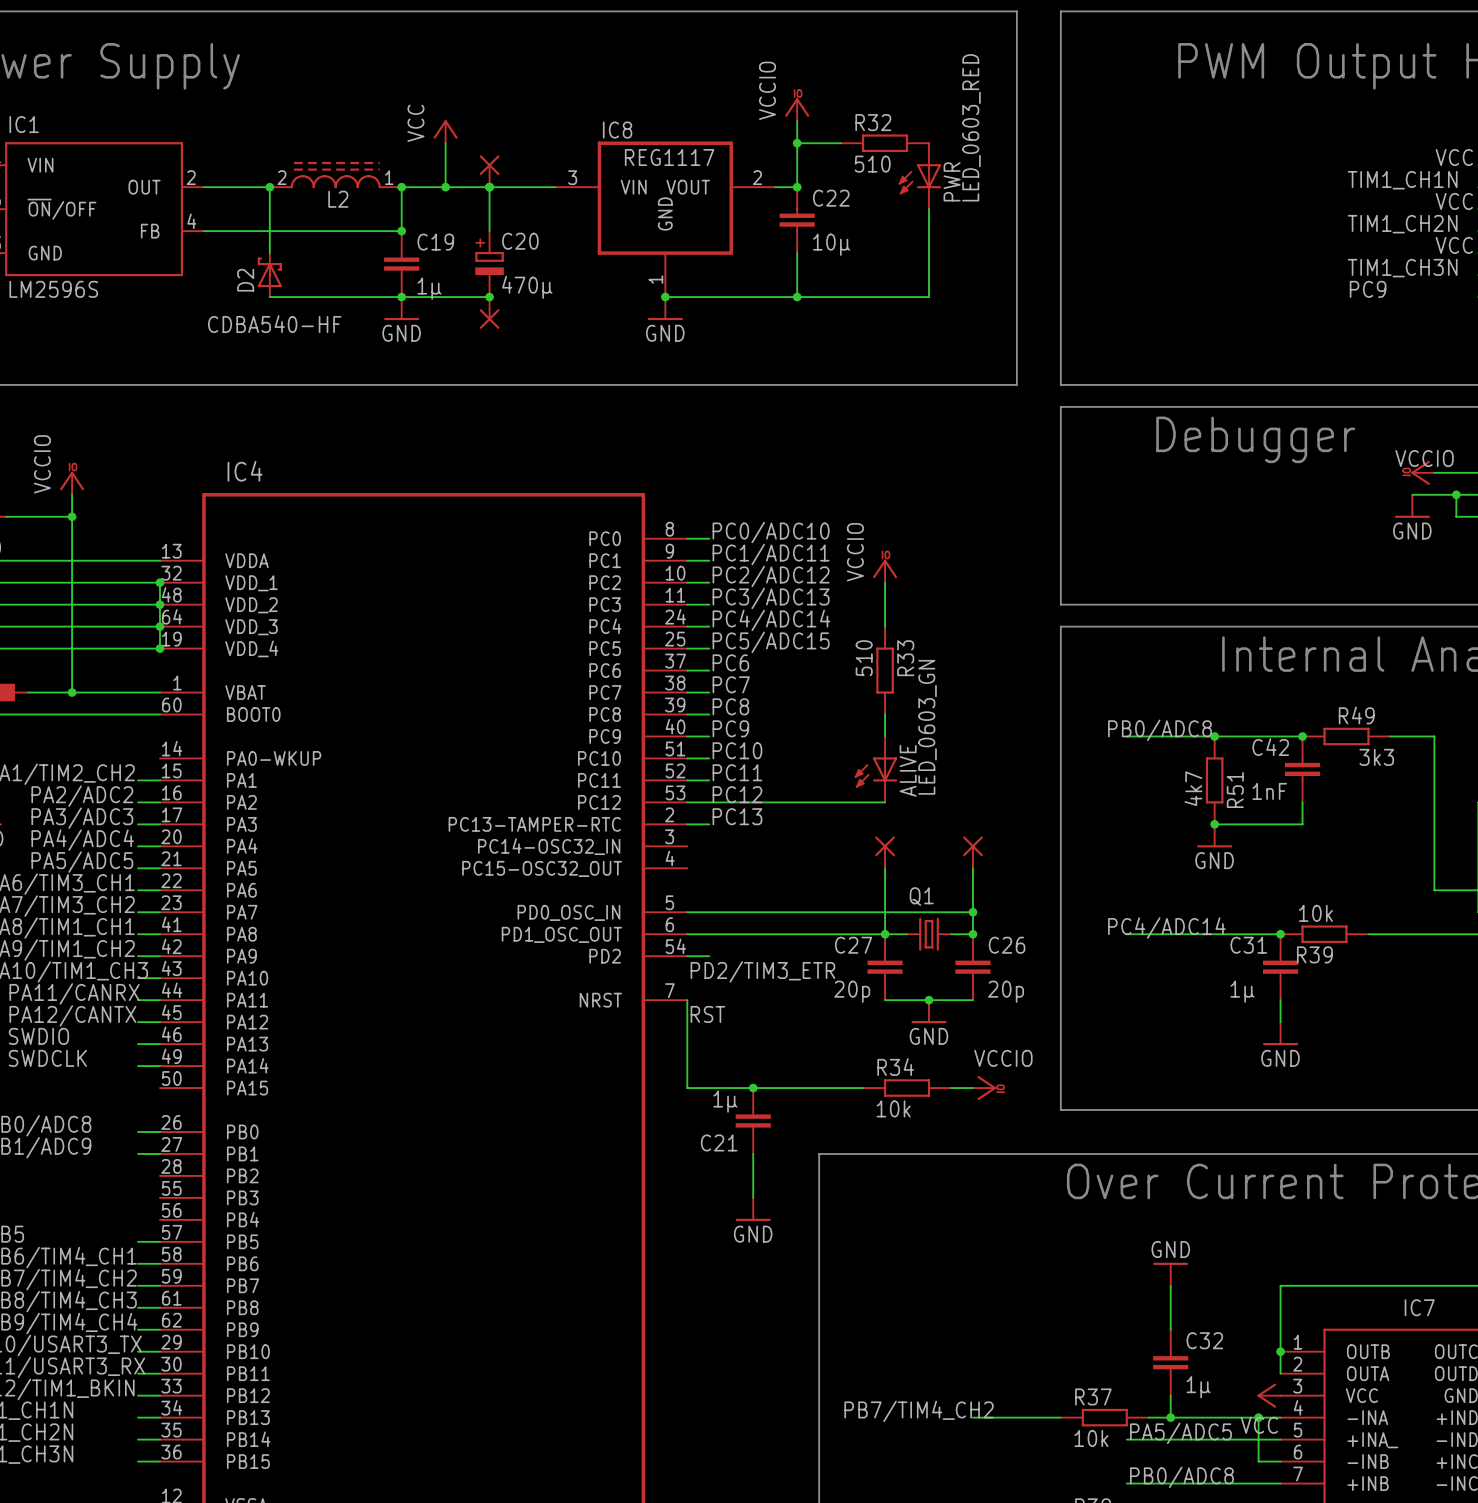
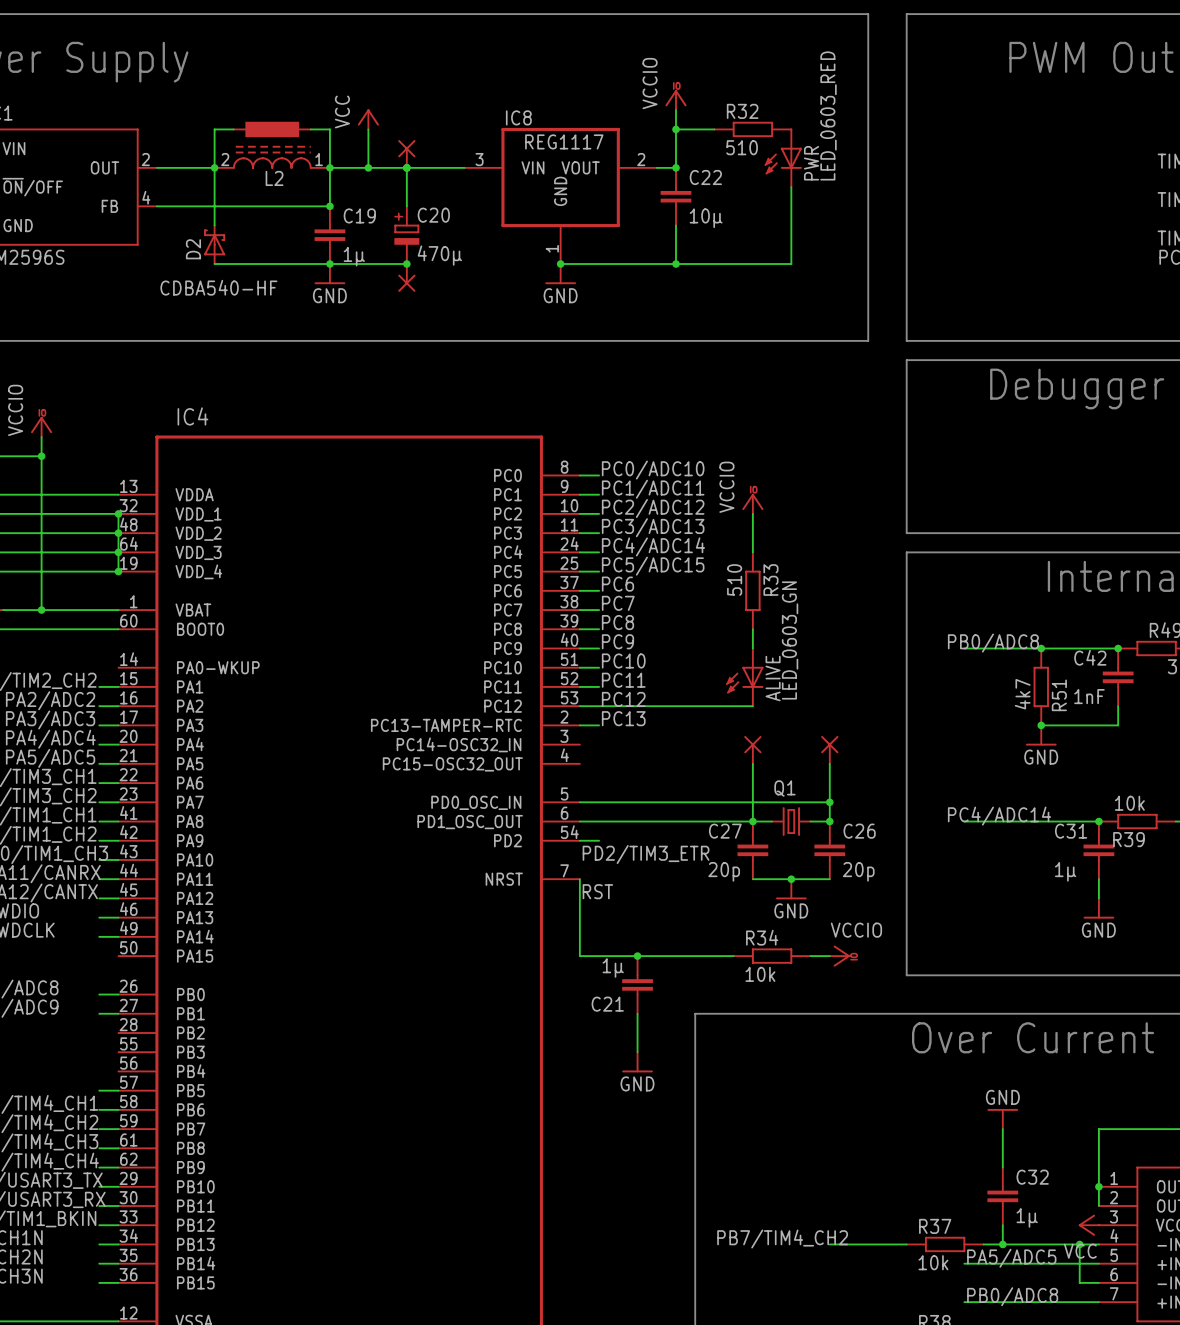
wire: none -> (233, 129) (214, 129) (214, 167)
part: none -> (272, 129)
wire: none -> (310, 129) (329, 129) (329, 167)

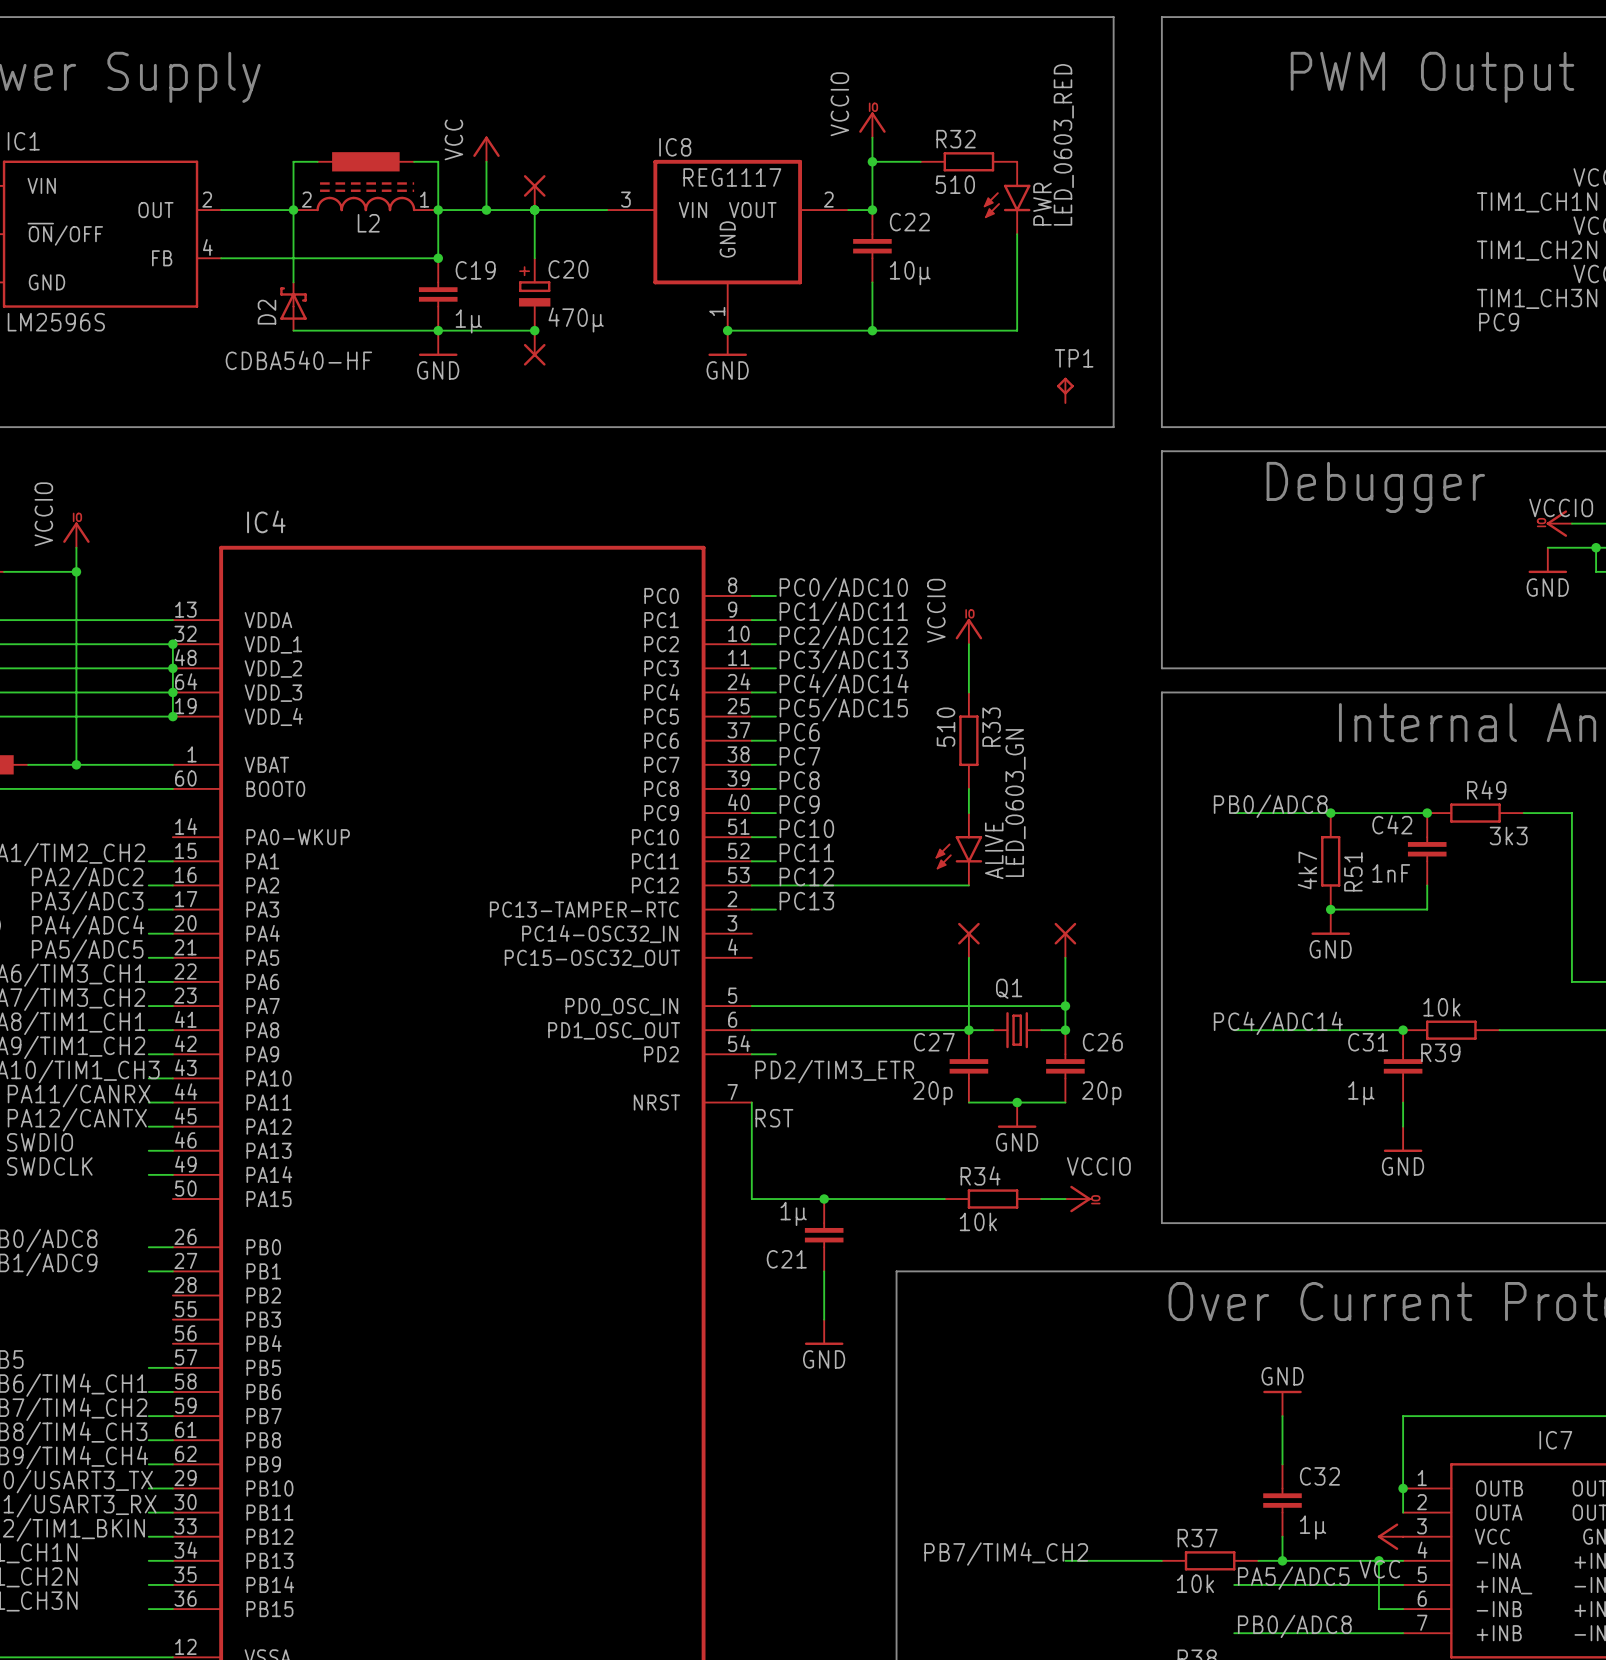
PWR symbol: [764, 129, 802, 188] -> [983, 161, 1031, 235]
TP1: none -> (1065, 390)
ALIVE symbol: [726, 648, 764, 707] -> [935, 813, 983, 886]

